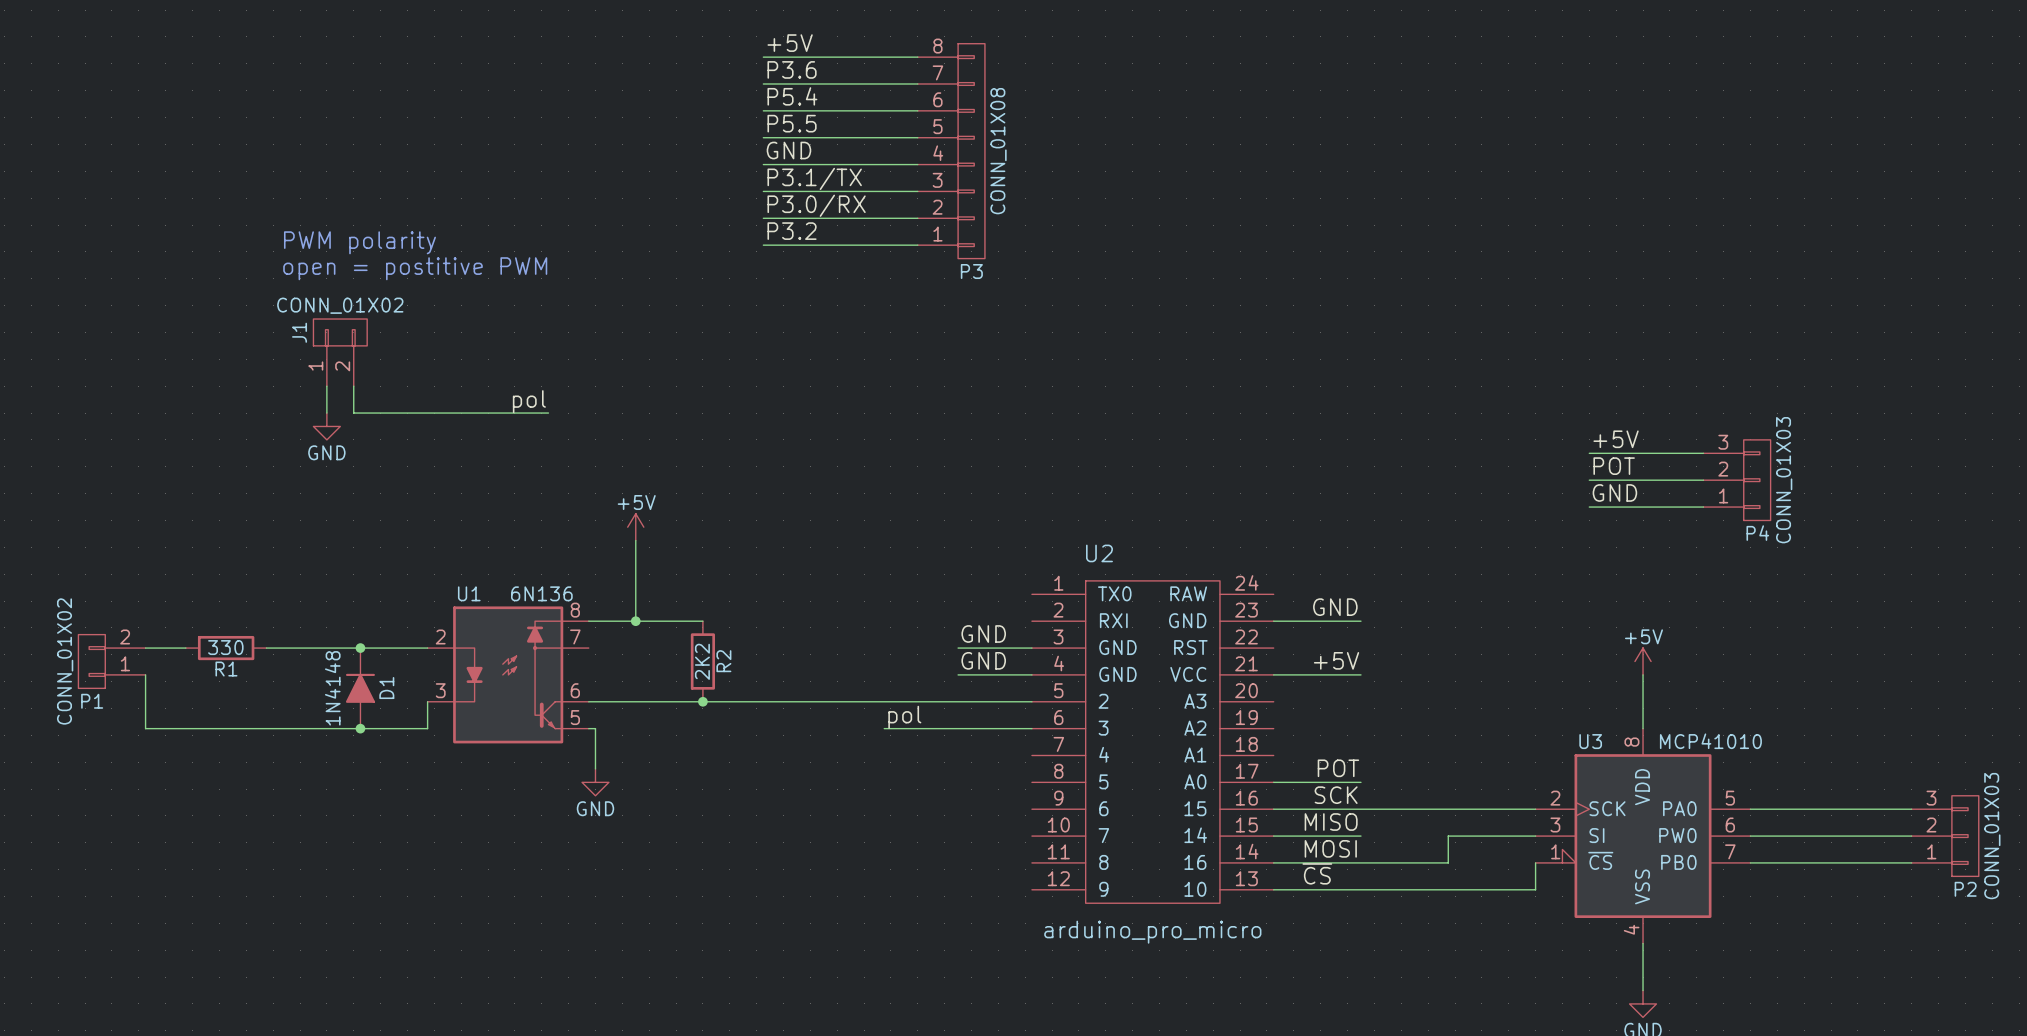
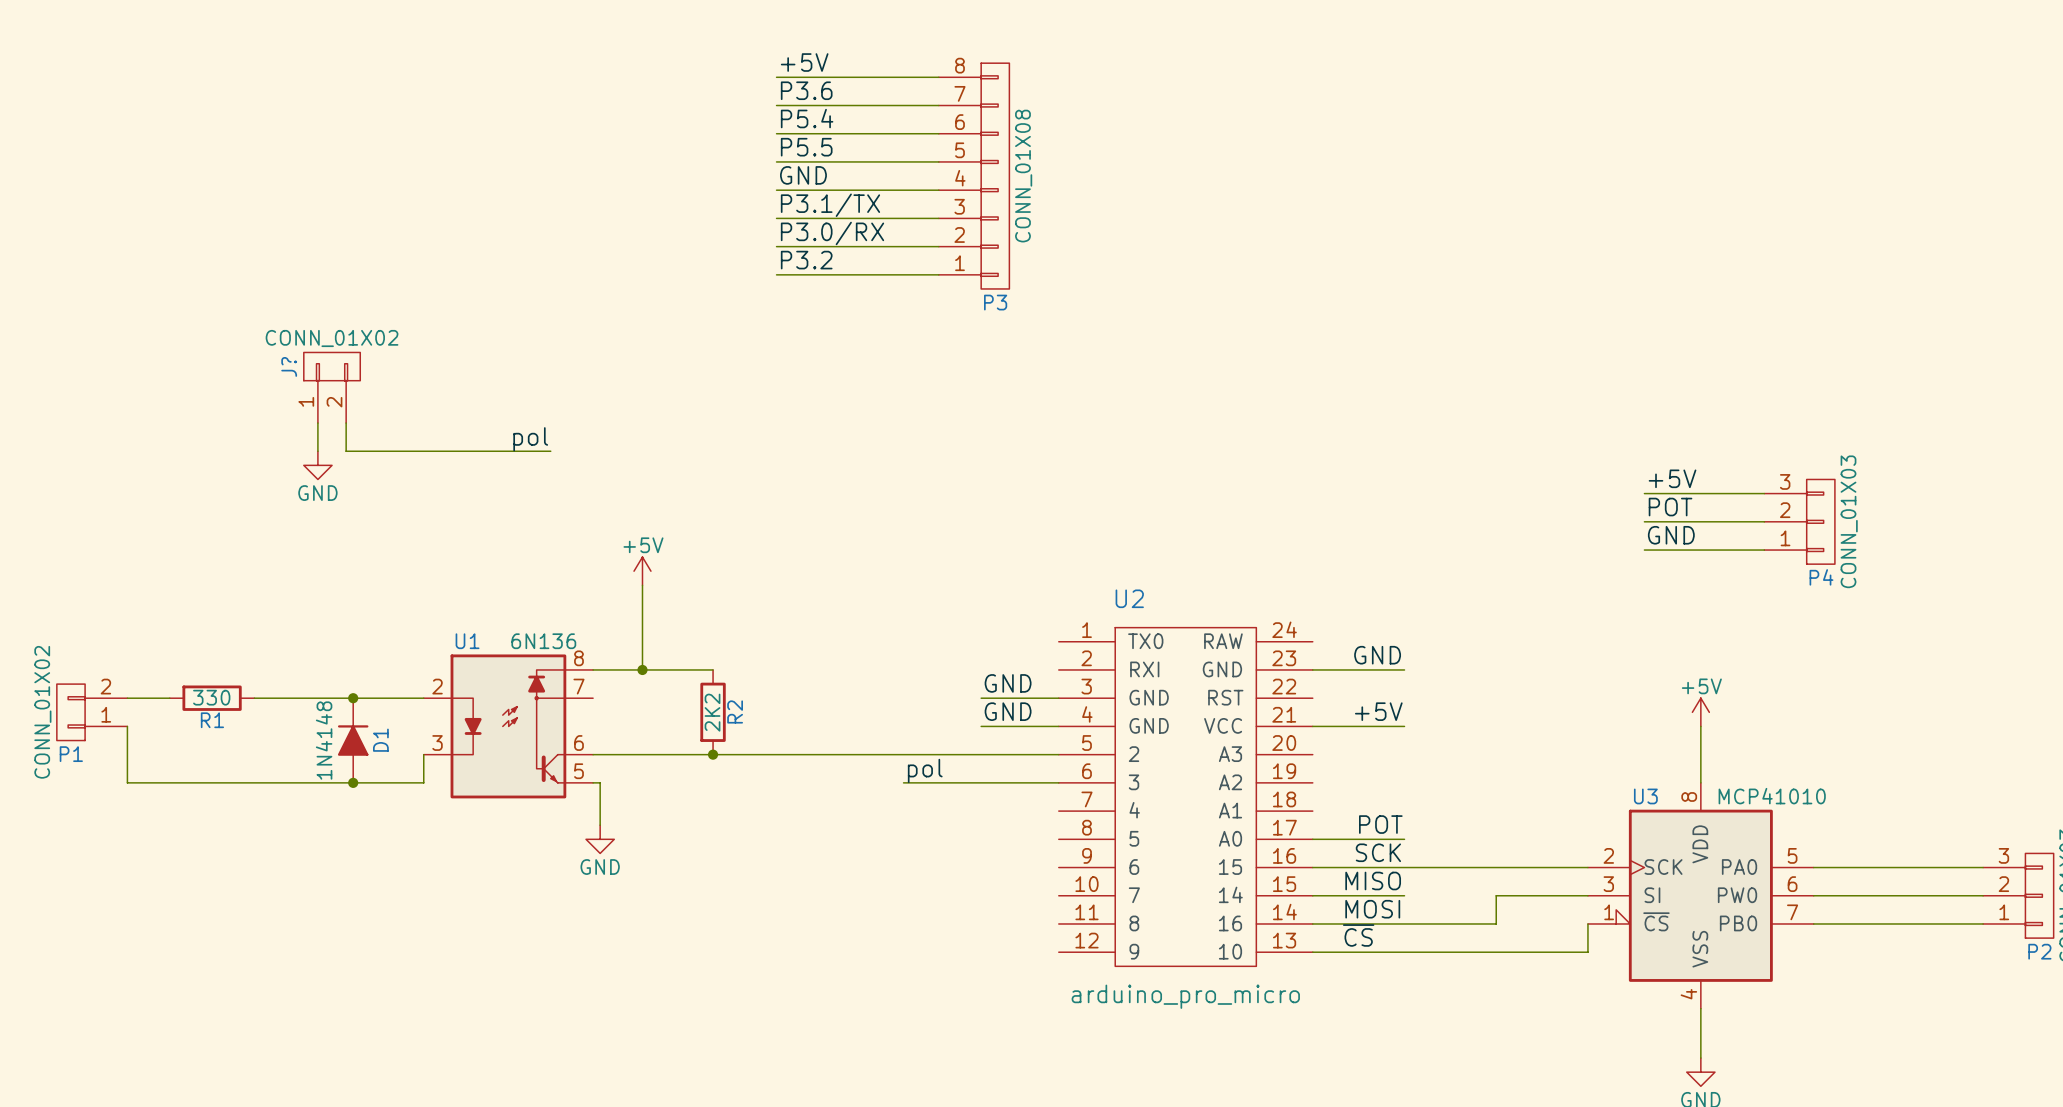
text: PWM polarity (359, 242) -> none
text: open = postitive PWM (415, 268) -> none
J1 name: J1 (299, 332) -> J? (289, 366)

